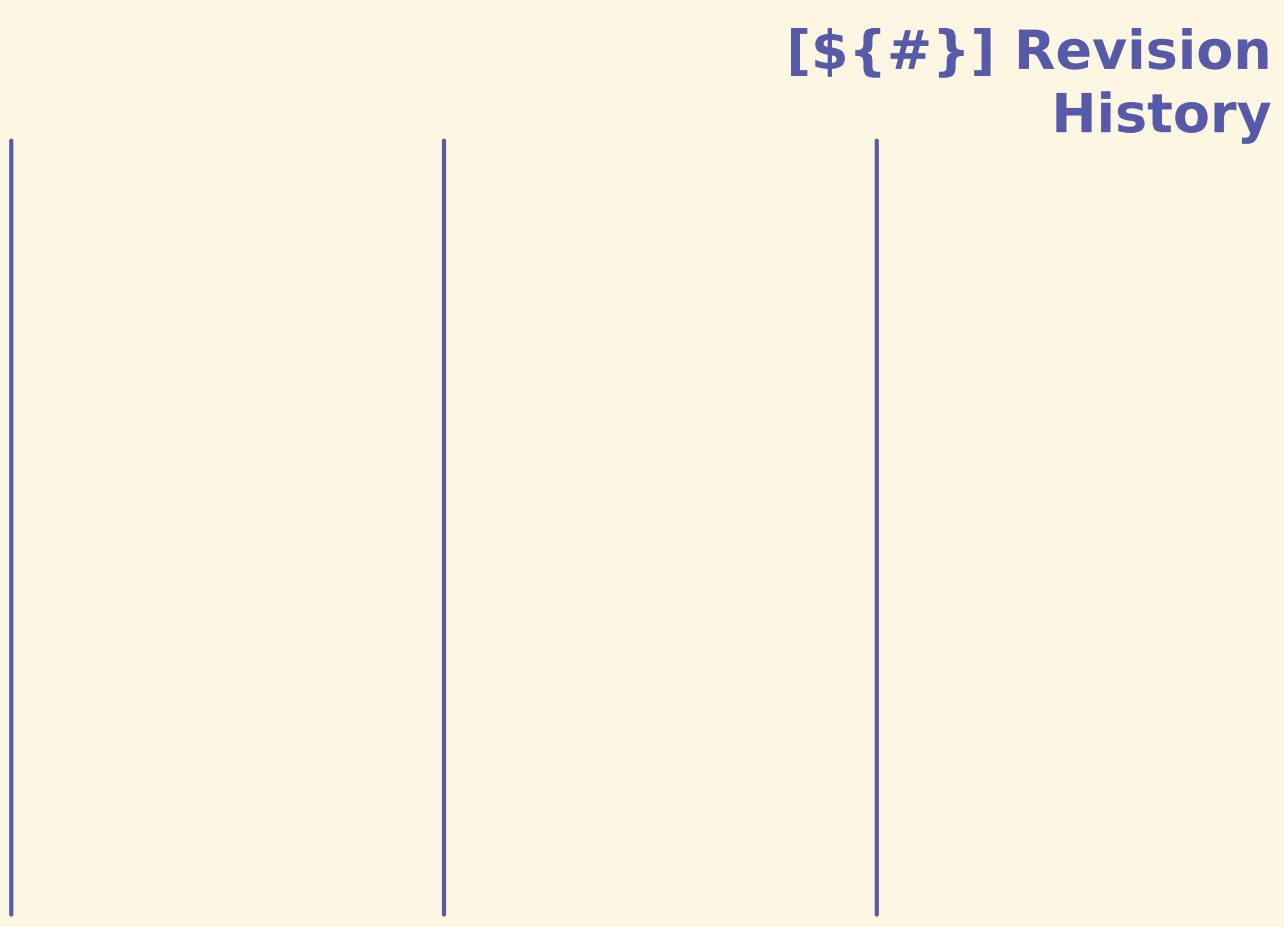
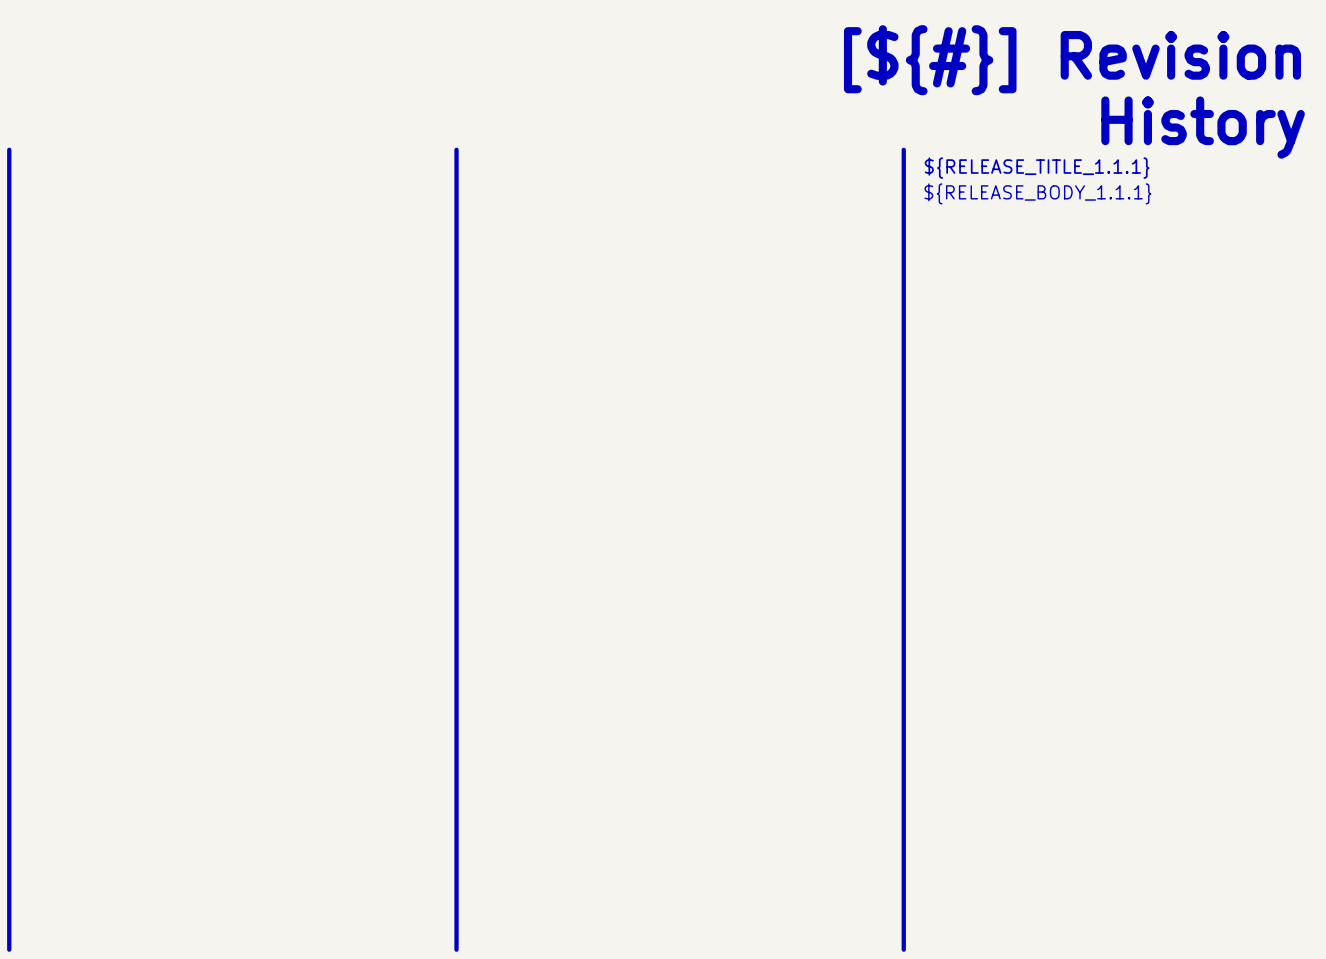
text: none -> ${RELEASE_TITLE_1.1.1} (1037, 168)
text: none -> ${RELEASE_BODY_1.1.1} (1037, 193)

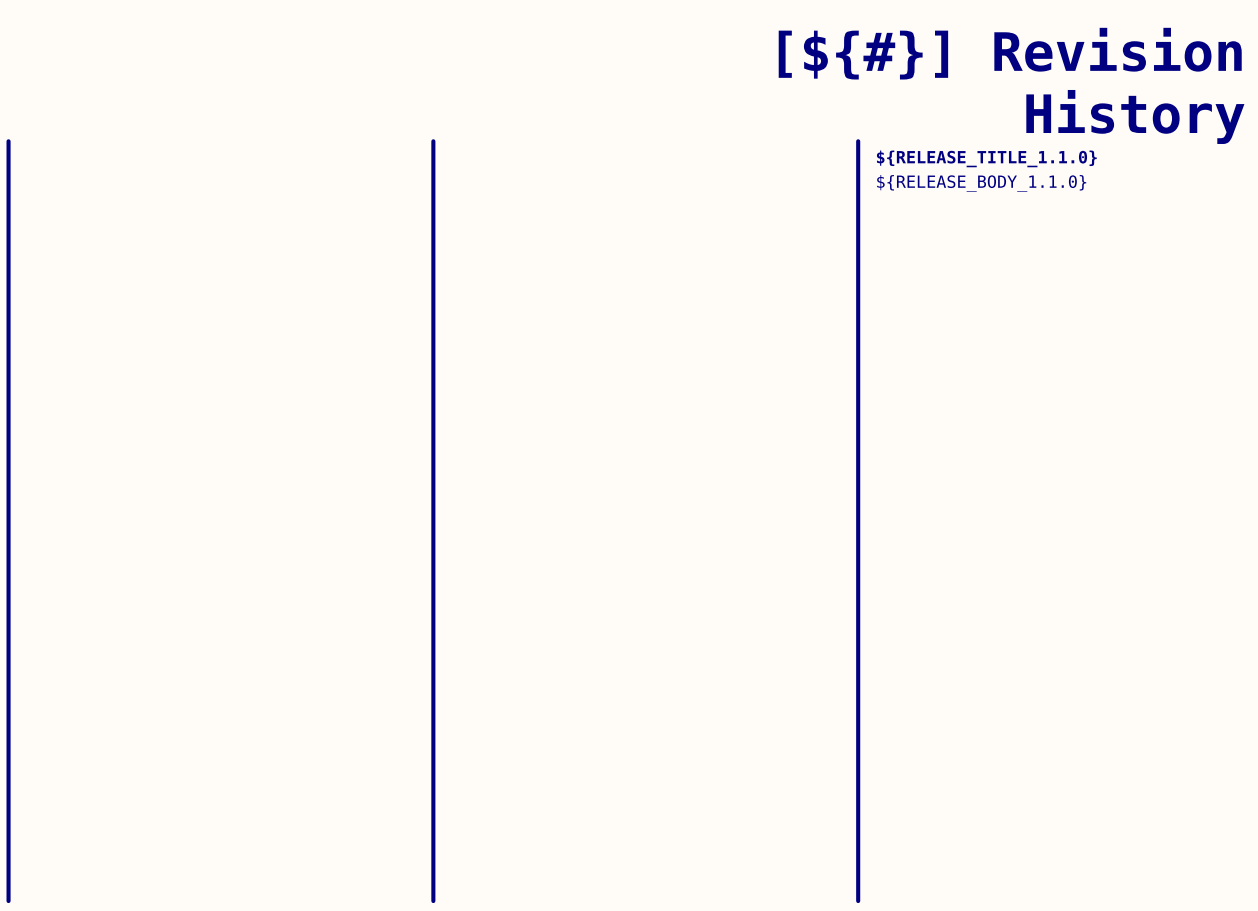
text: ${RELEASE_TITLE_1.1.1} (1037, 168) -> ${RELEASE_TITLE_1.1.0} (986, 158)
text: ${RELEASE_BODY_1.1.1} (1037, 193) -> ${RELEASE_BODY_1.1.0} (981, 183)

